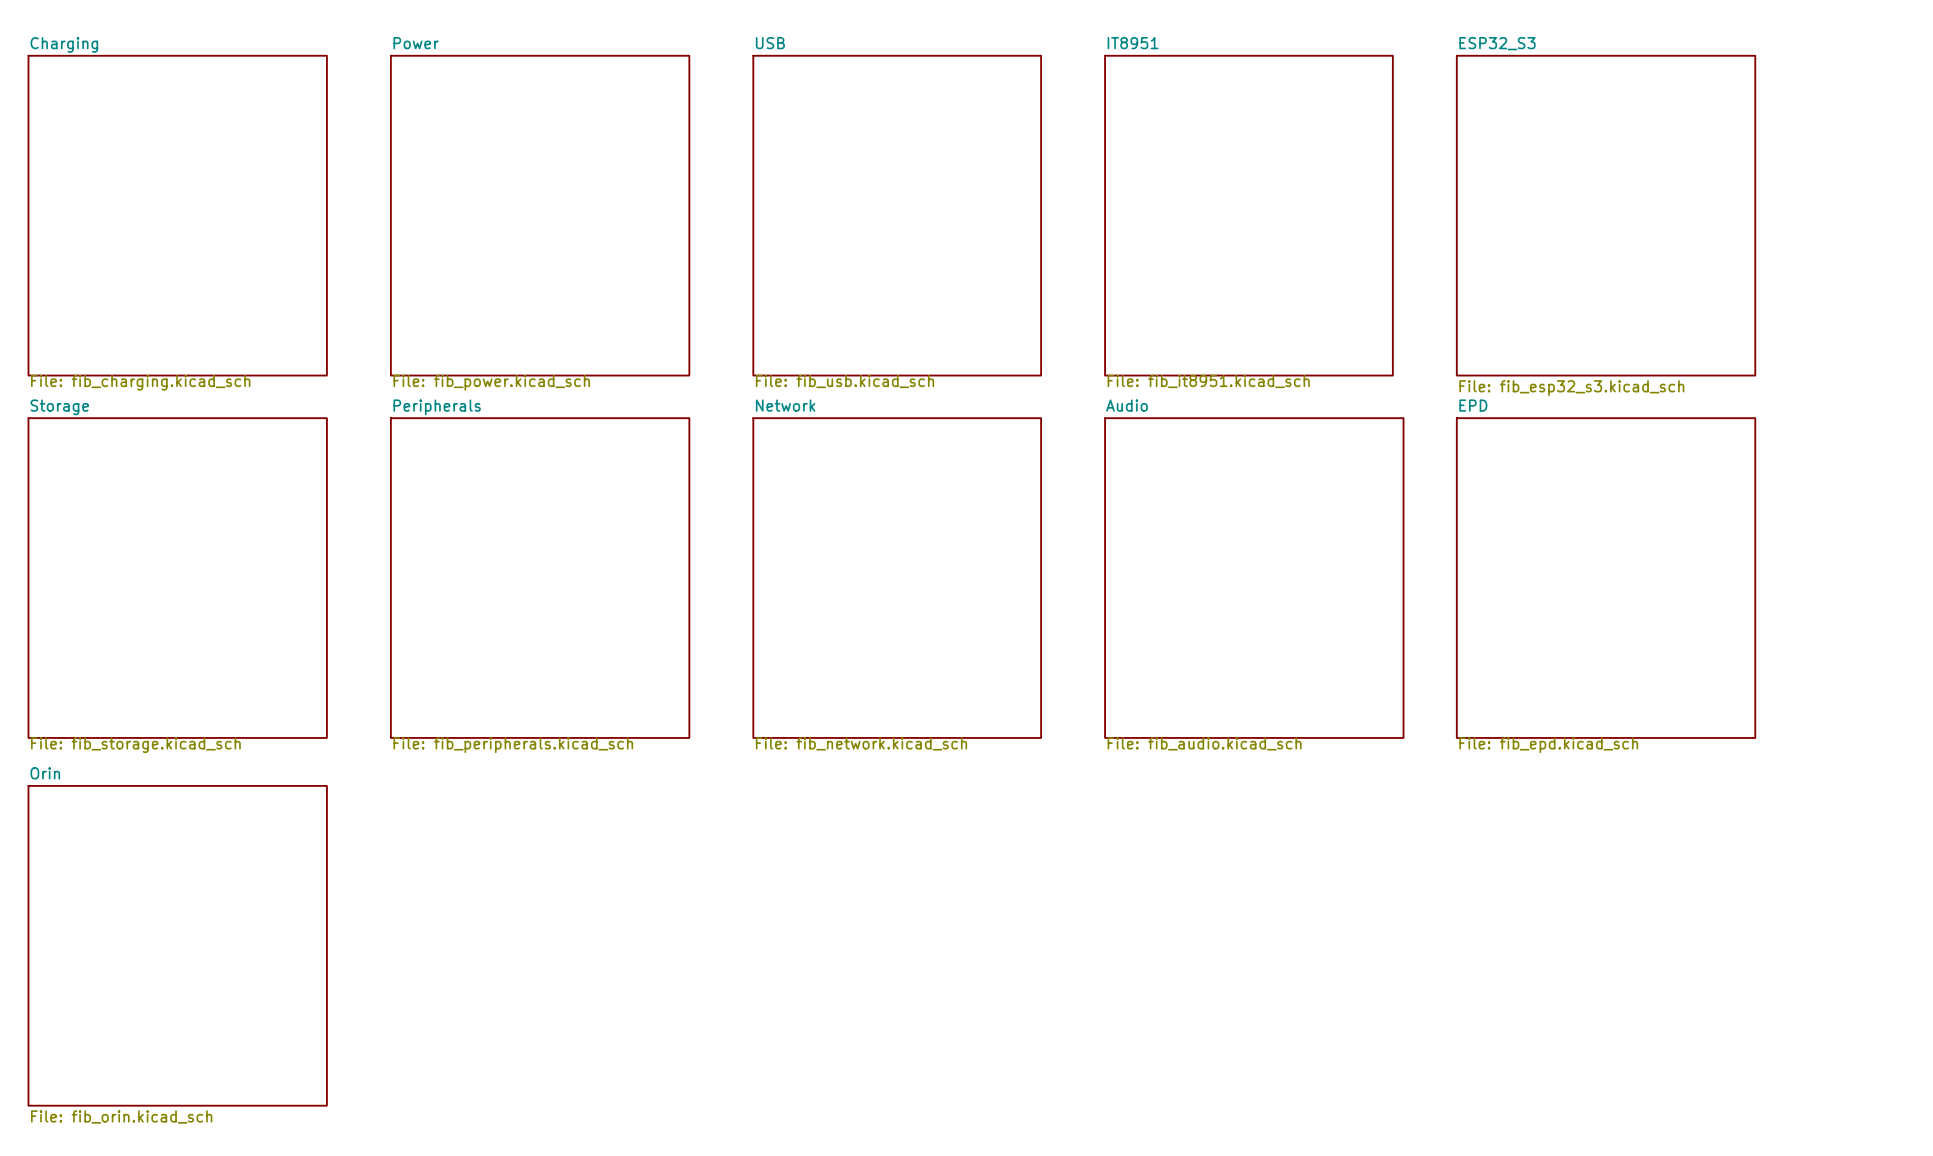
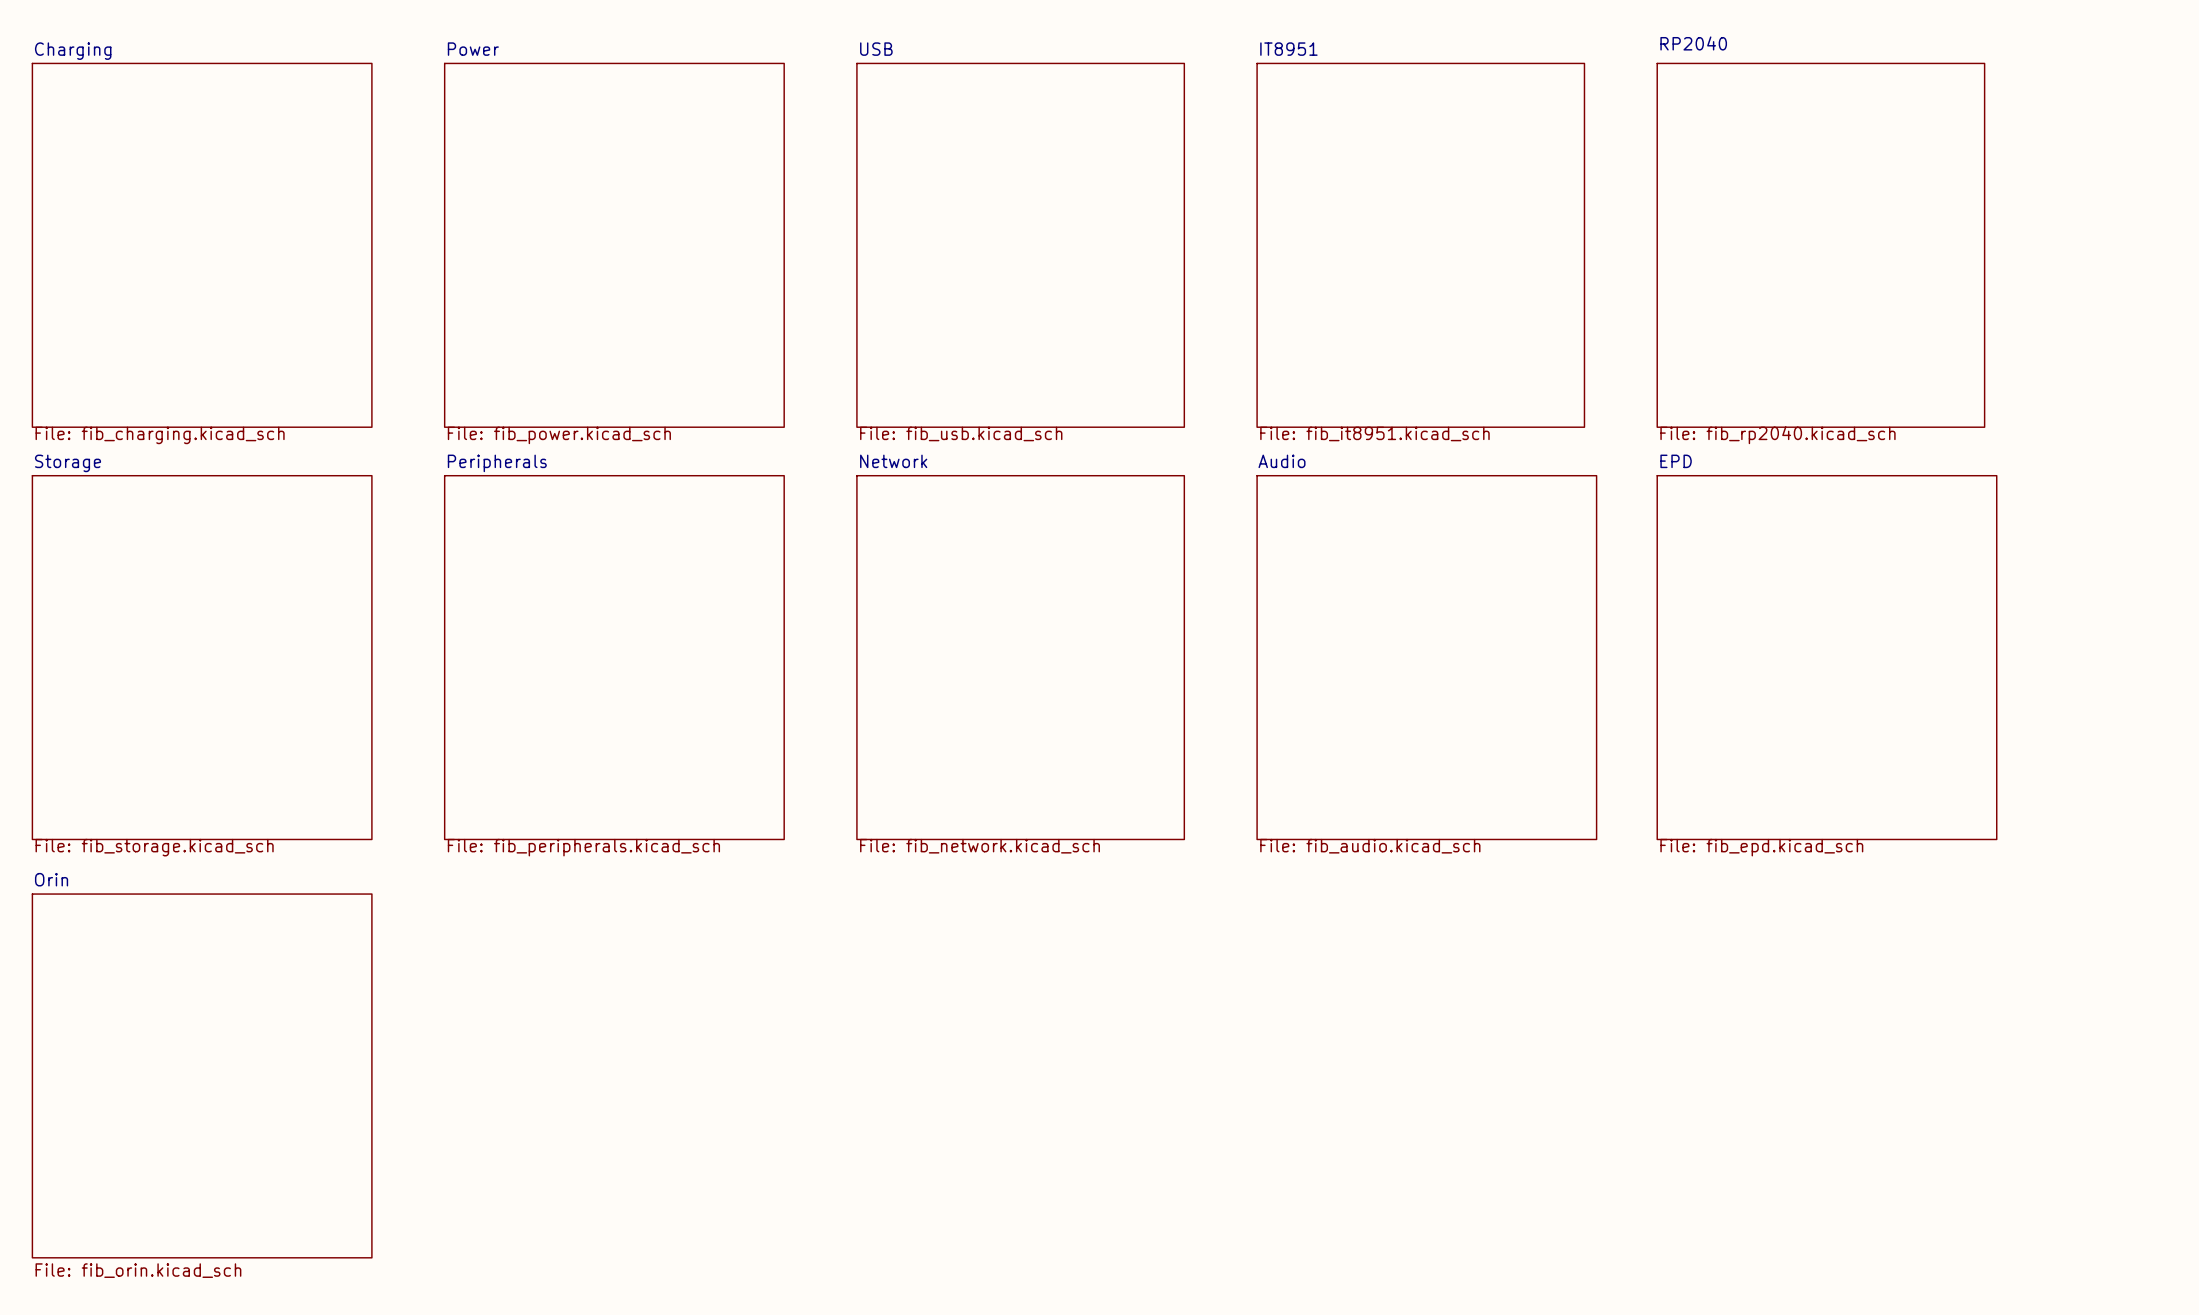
sheet RP2040: none -> File: fib_rp2040.kicad_sch (1820, 245)
sheet ESP32_S3: File: fib_esp32_s3.kicad_sch (1606, 215) -> none

